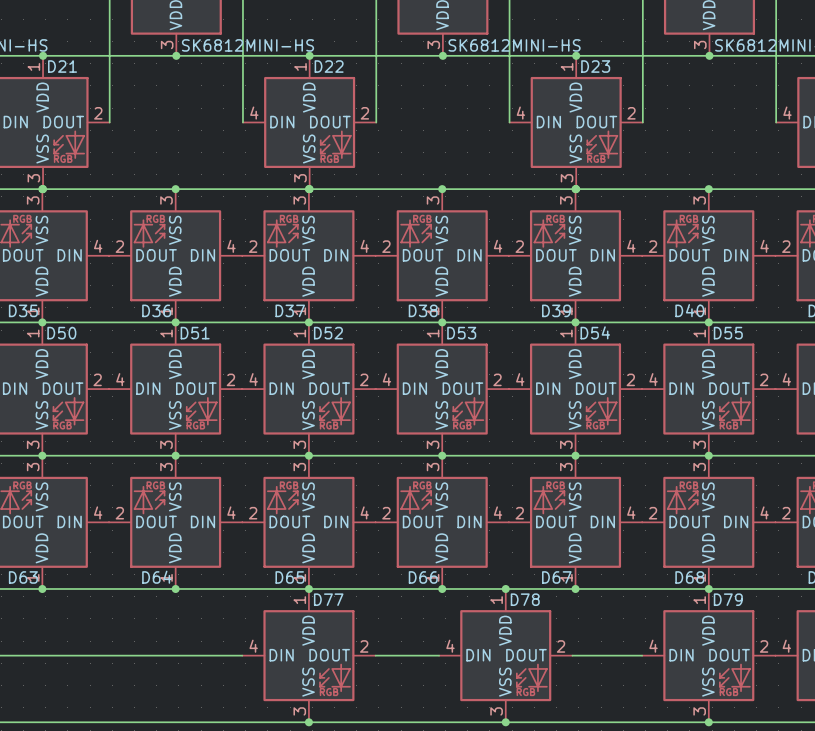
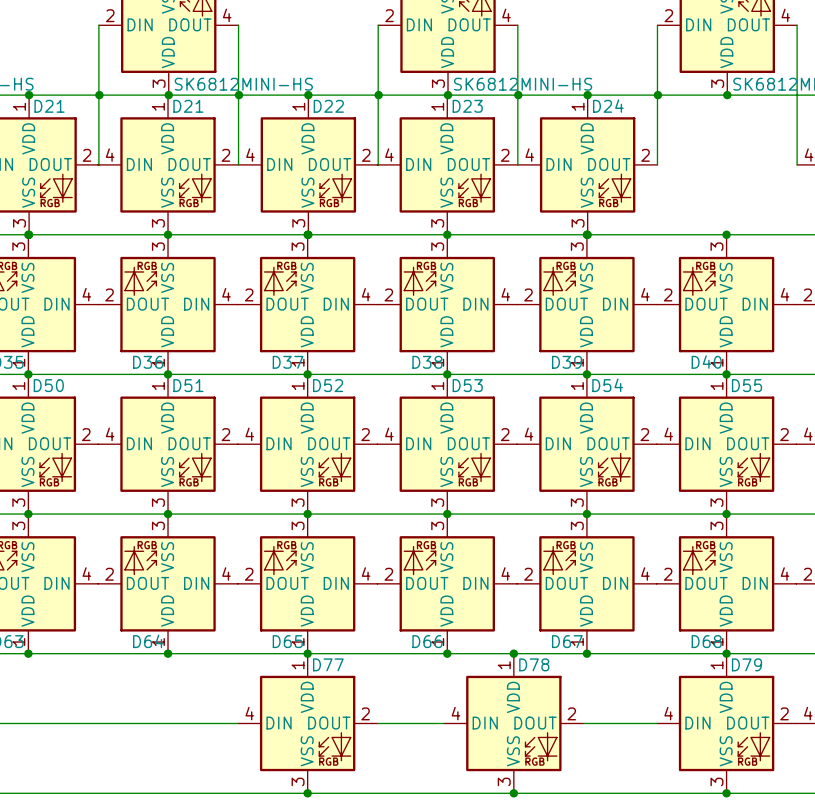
junction: none -> (99, 95)
junction: none -> (239, 95)
junction: none -> (378, 95)
junction: none -> (518, 95)
junction: none -> (657, 95)
D23 name: D23 (595, 66) -> D24 (608, 106)
D21: none -> (168, 164)
D23: none -> (447, 164)

